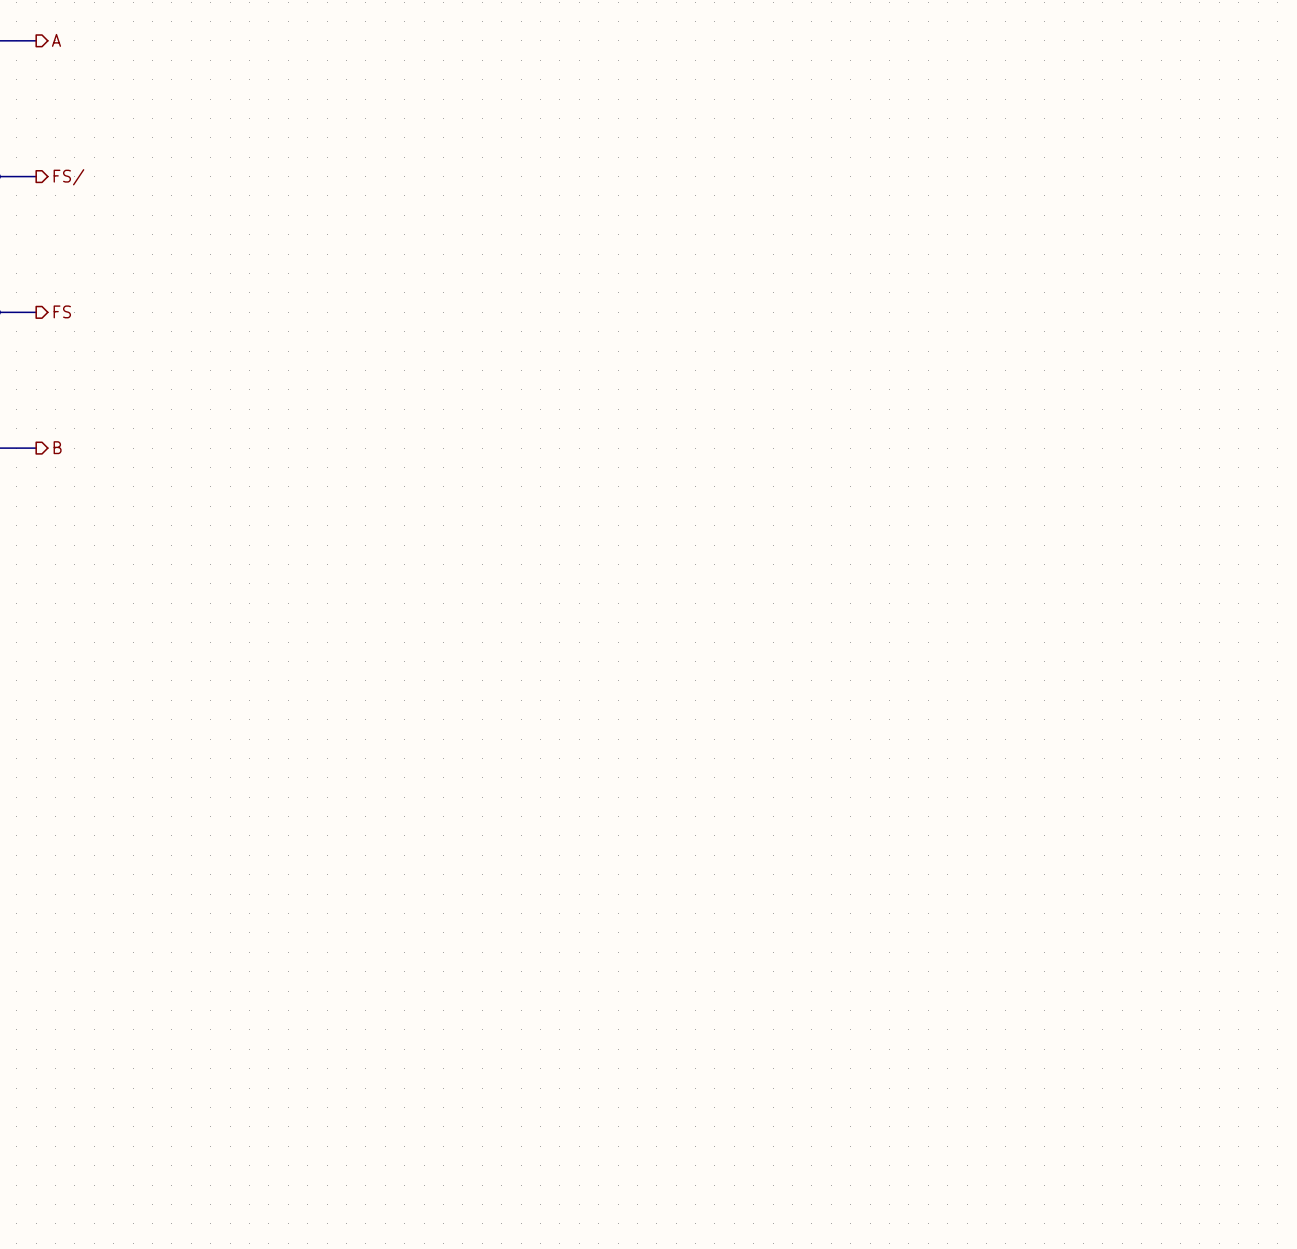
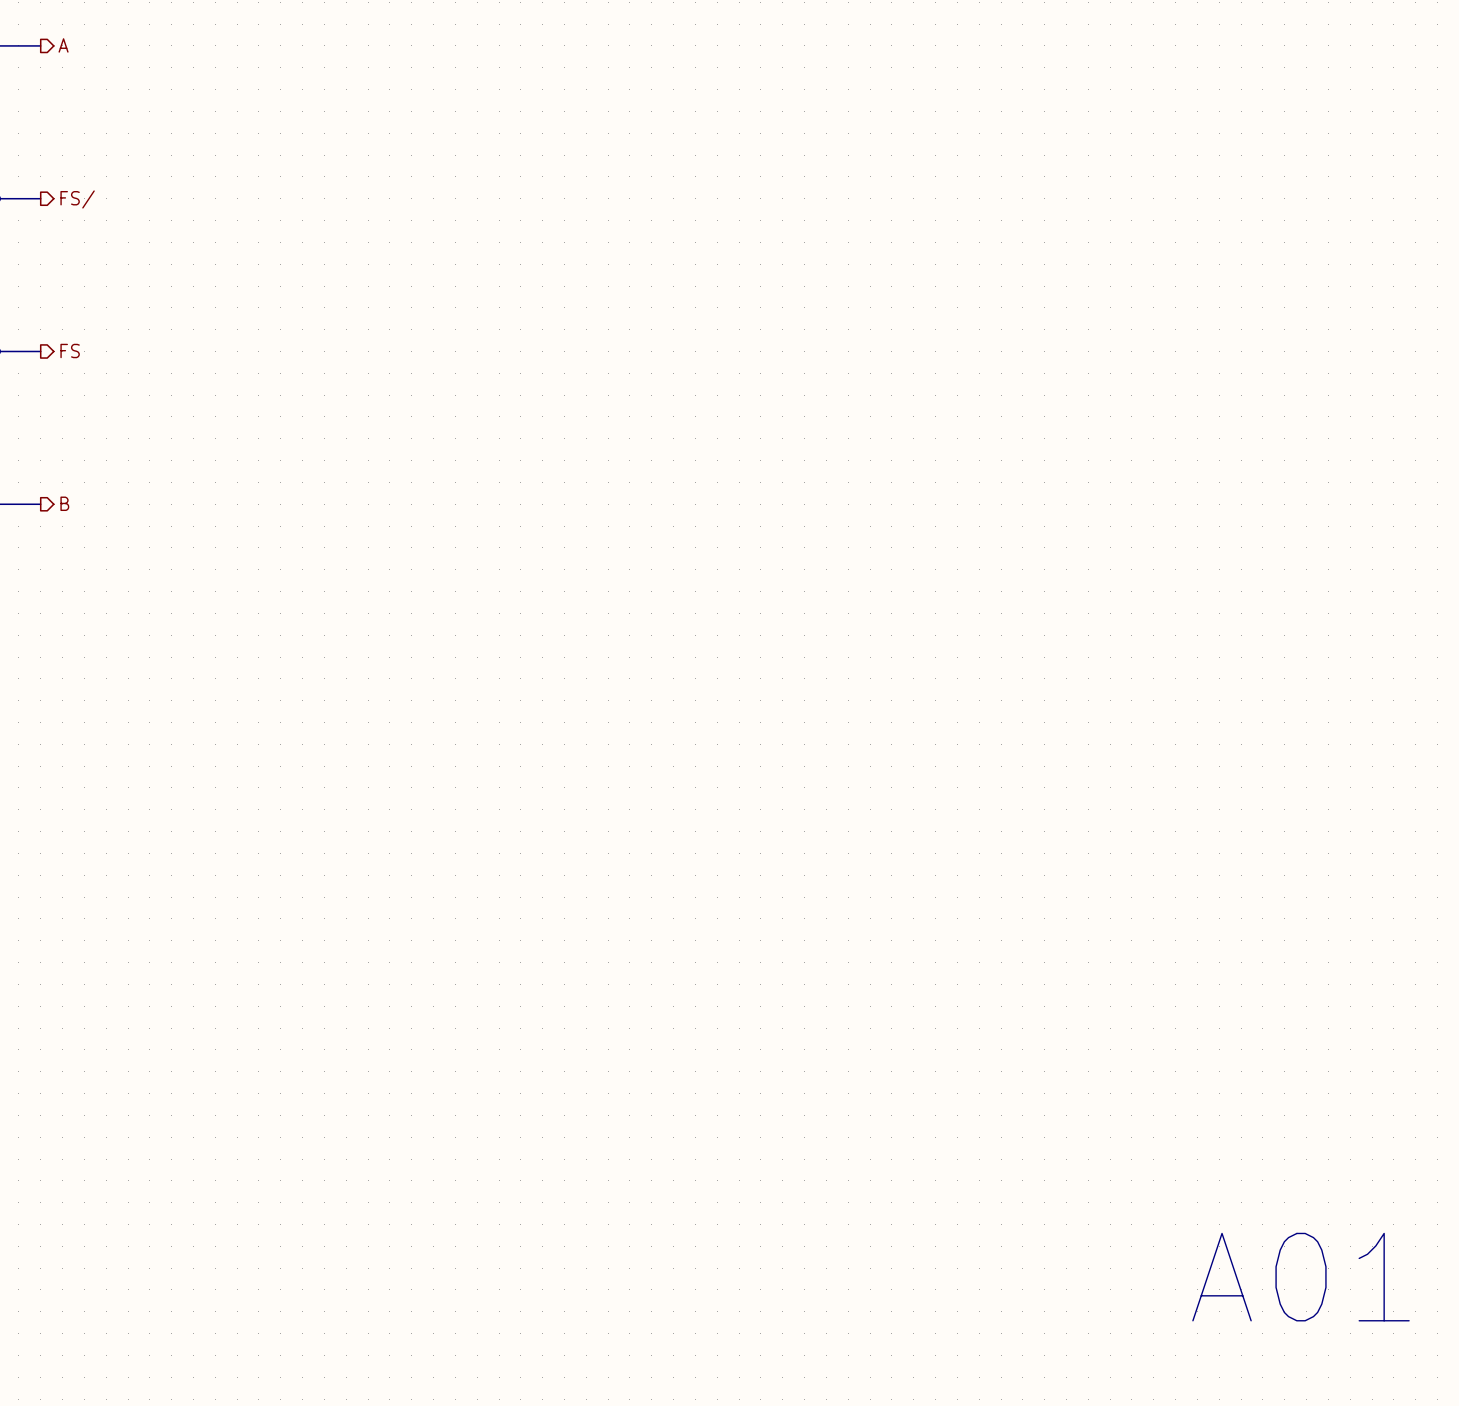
text: none -> A01 (1301, 1277)

